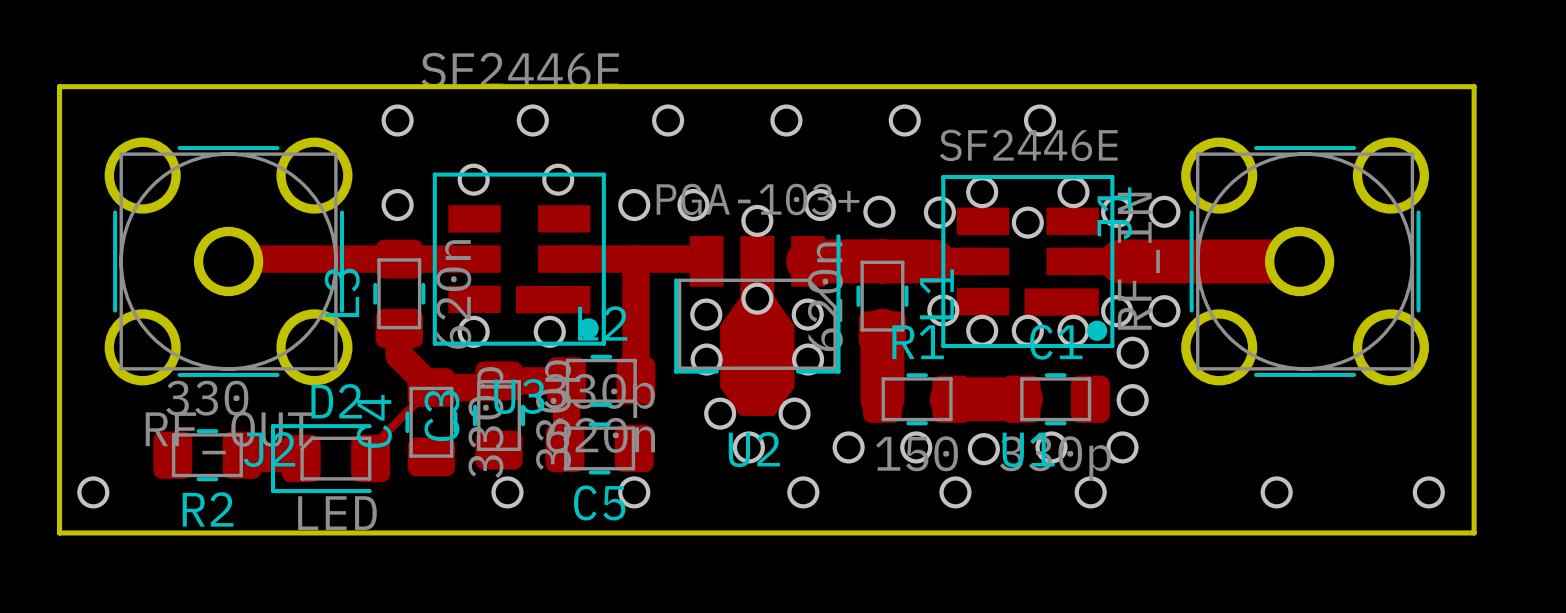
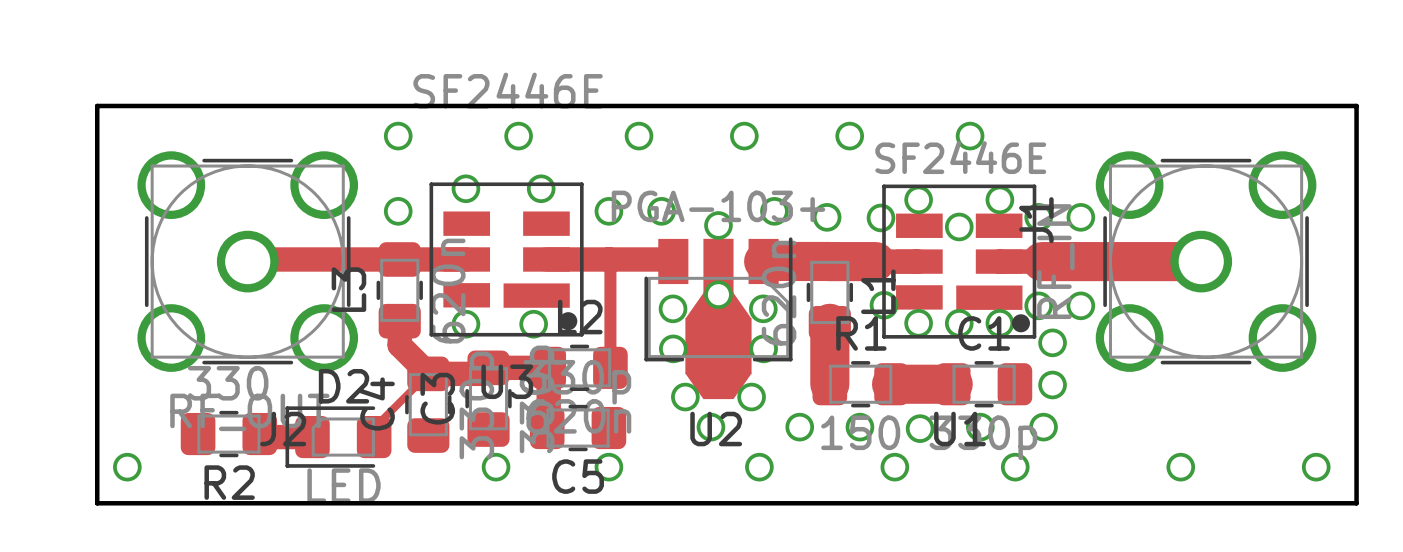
track width: thick (635, 260) (635, 380) -> thin (610, 260) (610, 367)

